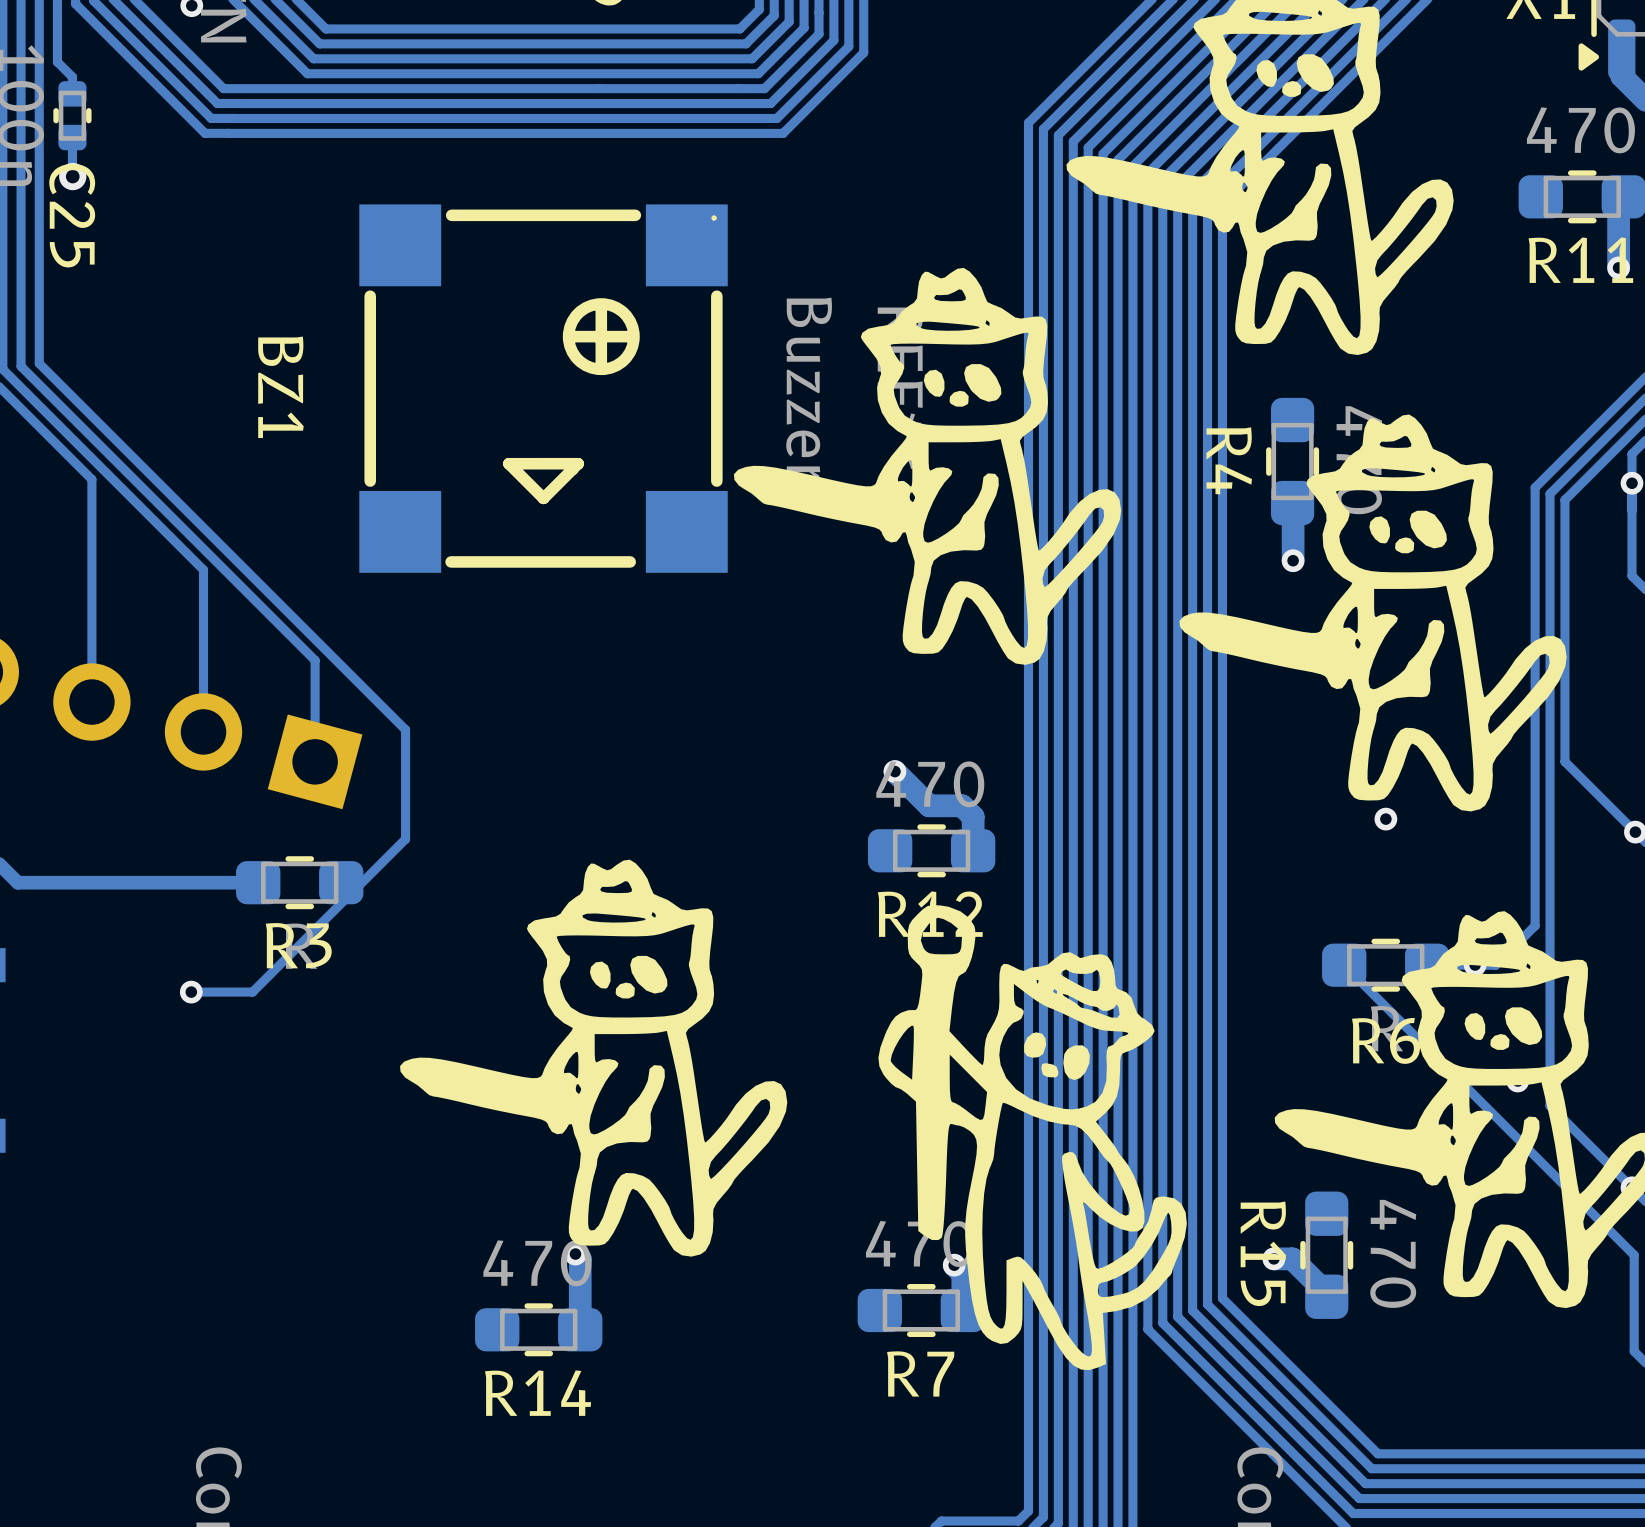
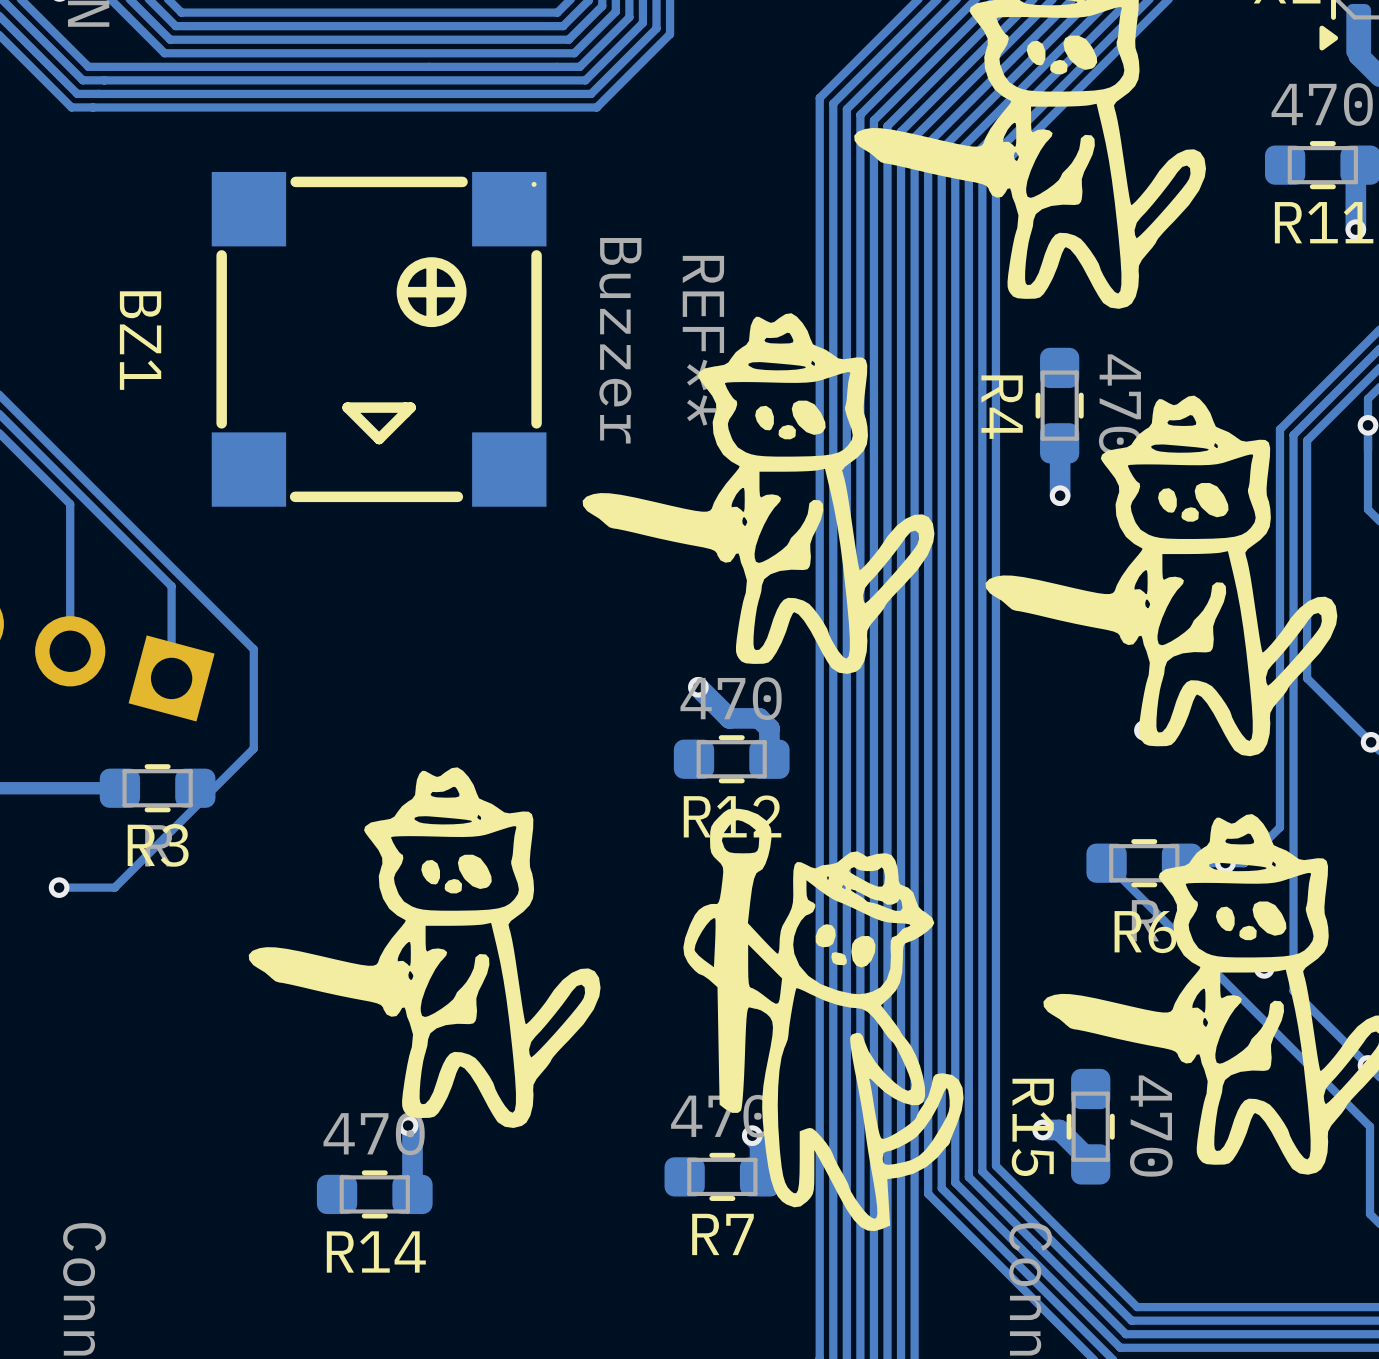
drawing position: (927, 466) -> (758, 493)
drawing position: (1373, 612) -> (1161, 575)

